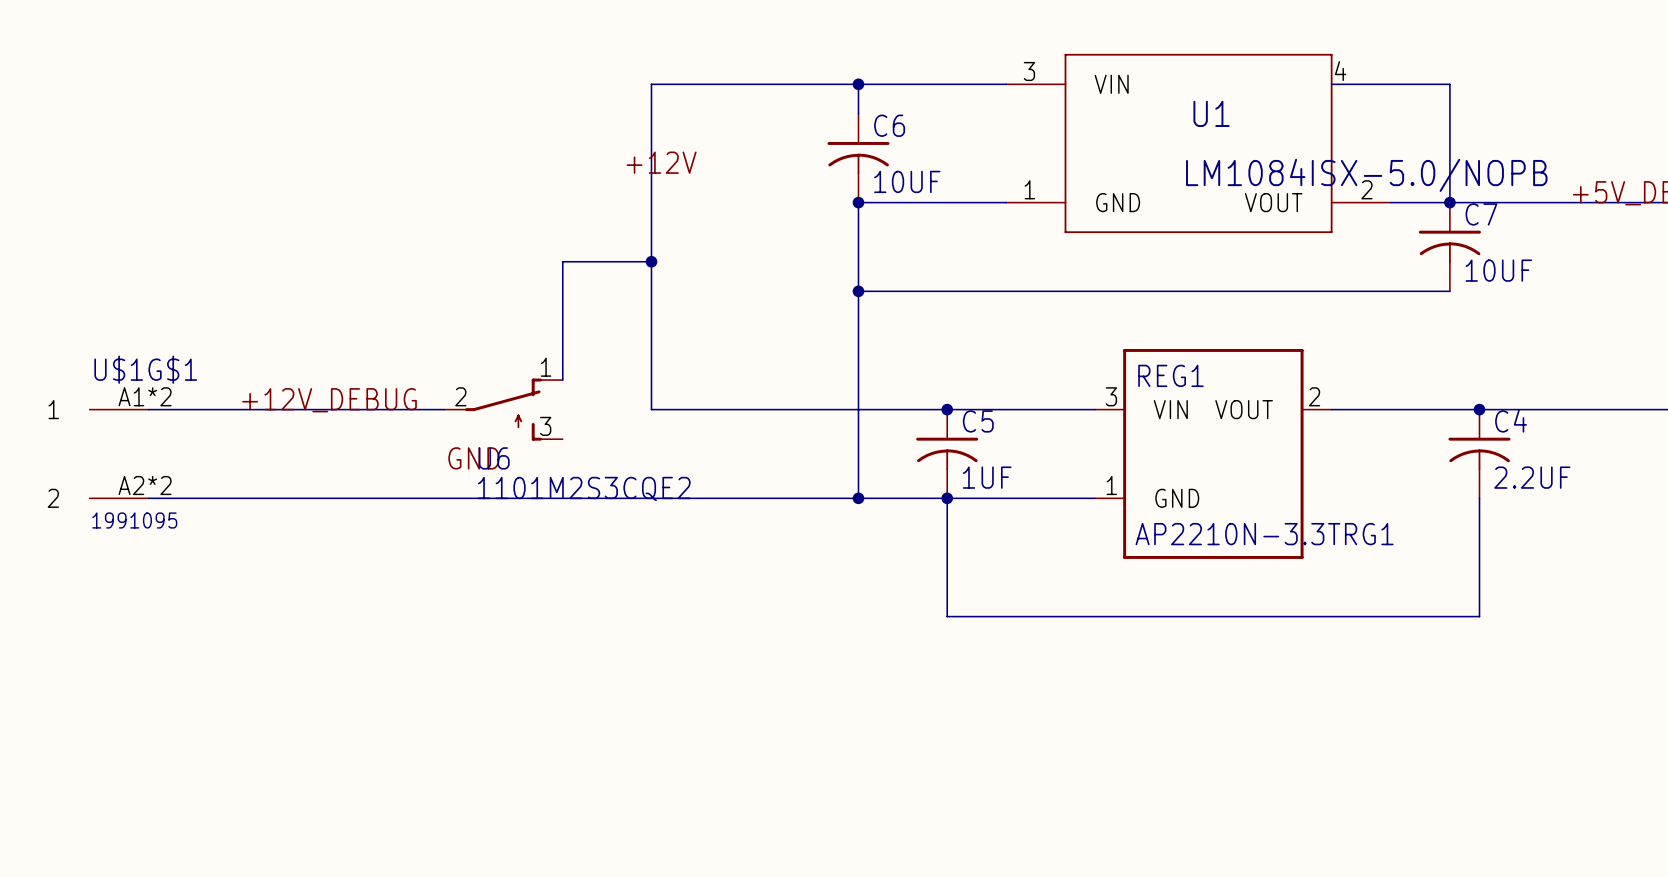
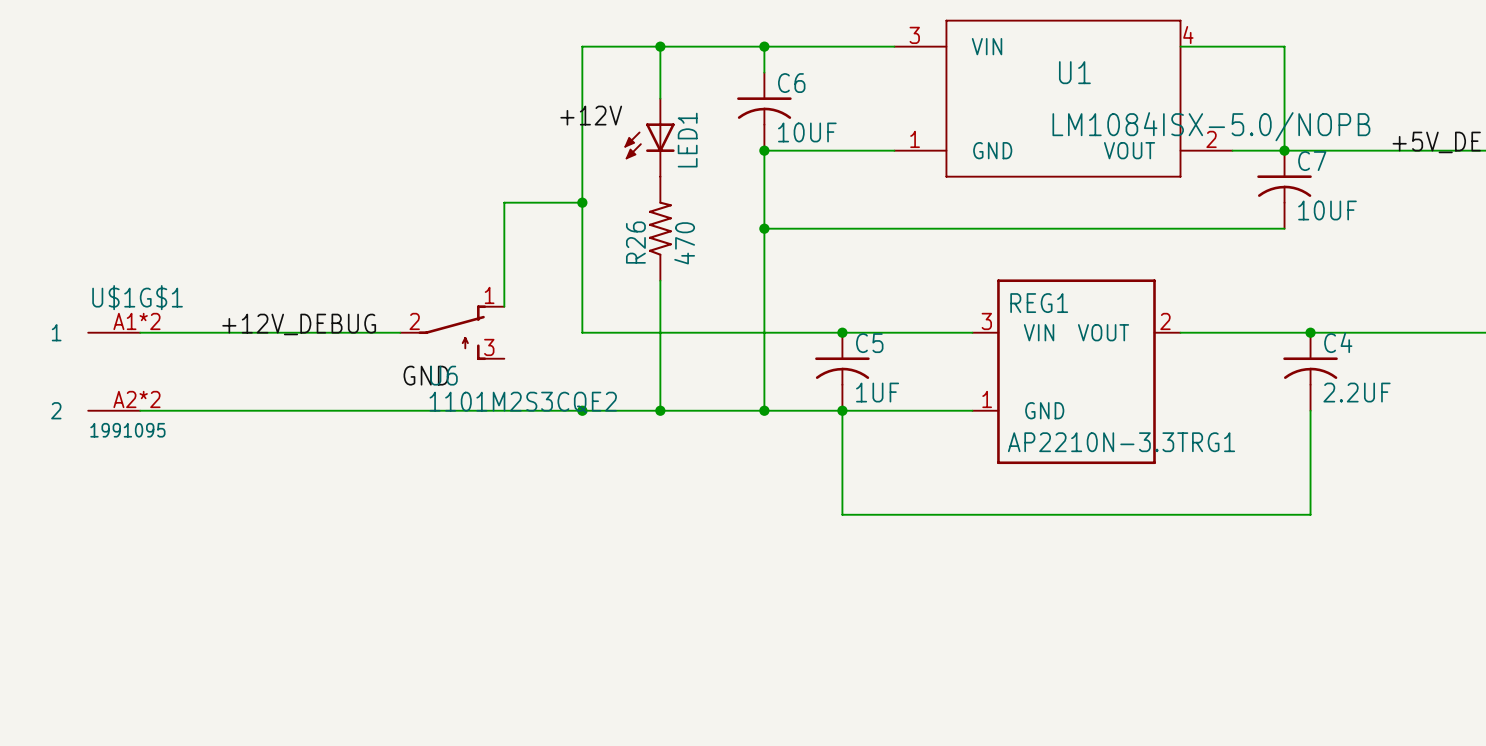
wire: none -> (660, 46) (660, 98)
junction: none -> (660, 46)
LED1: none -> (649, 137)
R26: none -> 470 (660, 228)
wire: none -> (660, 280) (660, 410)
junction: none -> (582, 410)
junction: none -> (660, 410)

